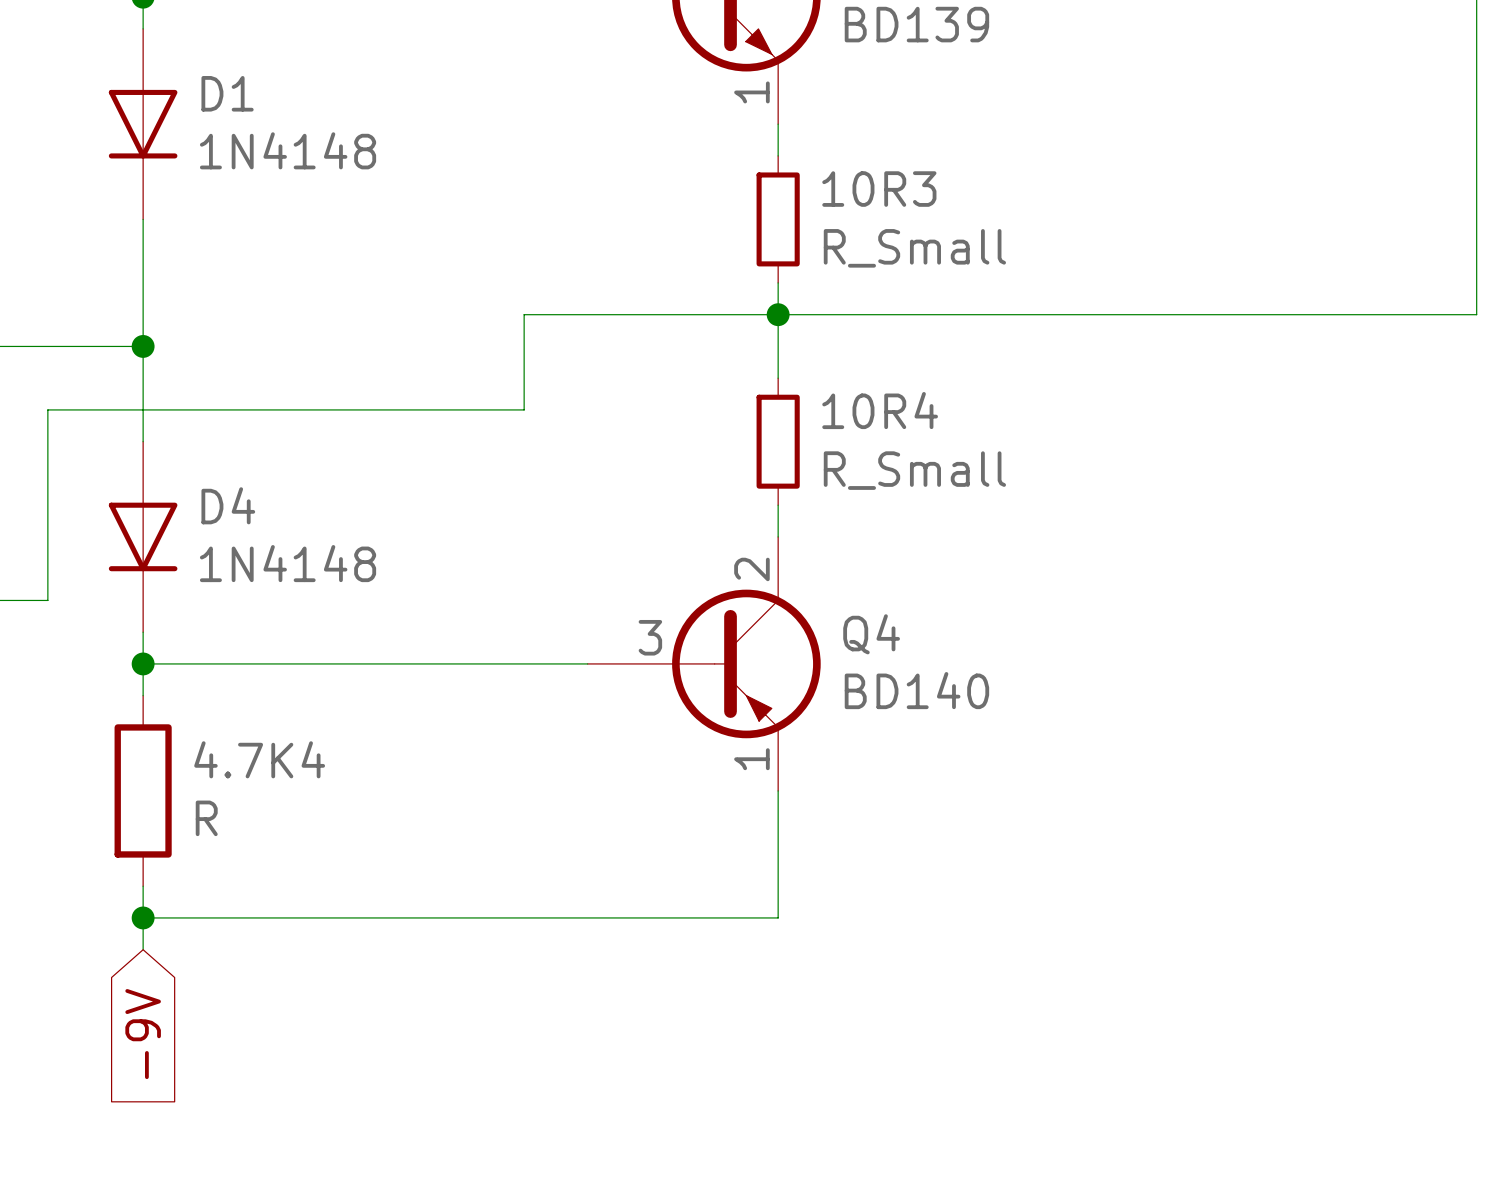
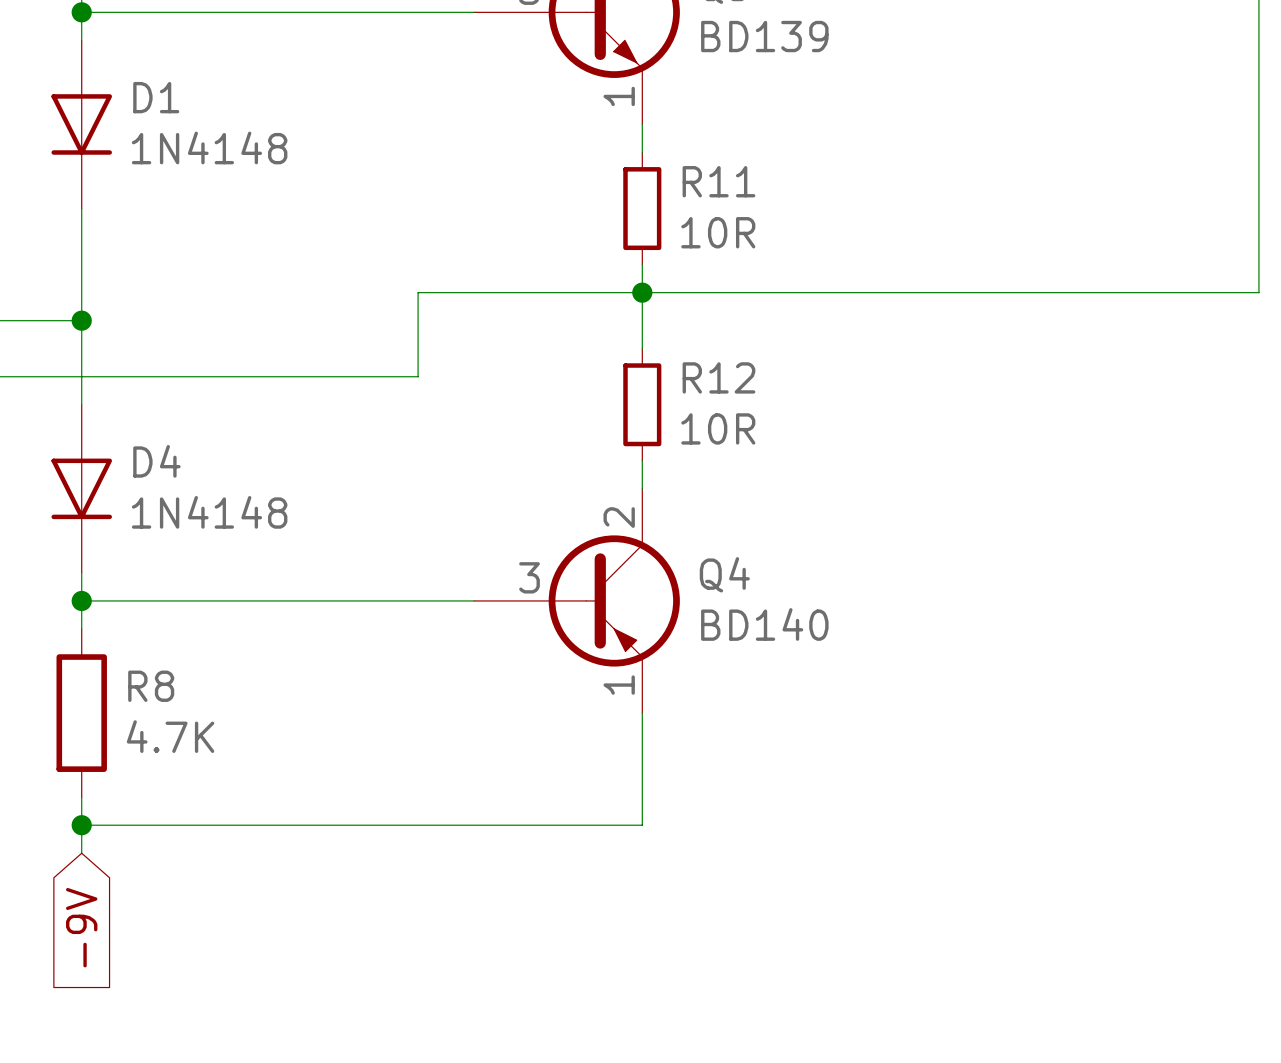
10R3 name: 10R3 (879, 189) -> R11 (718, 181)
10R3 value: R_Small (914, 248) -> 10R (718, 232)
10R4 name: 10R4 (880, 410) -> R12 (718, 377)
10R4 value: R_Small (914, 470) -> 10R (718, 428)
4.7K4 name: 4.7K4 (259, 759) -> R8 (151, 686)
4.7K4 value: R (206, 818) -> 4.7K (170, 736)

